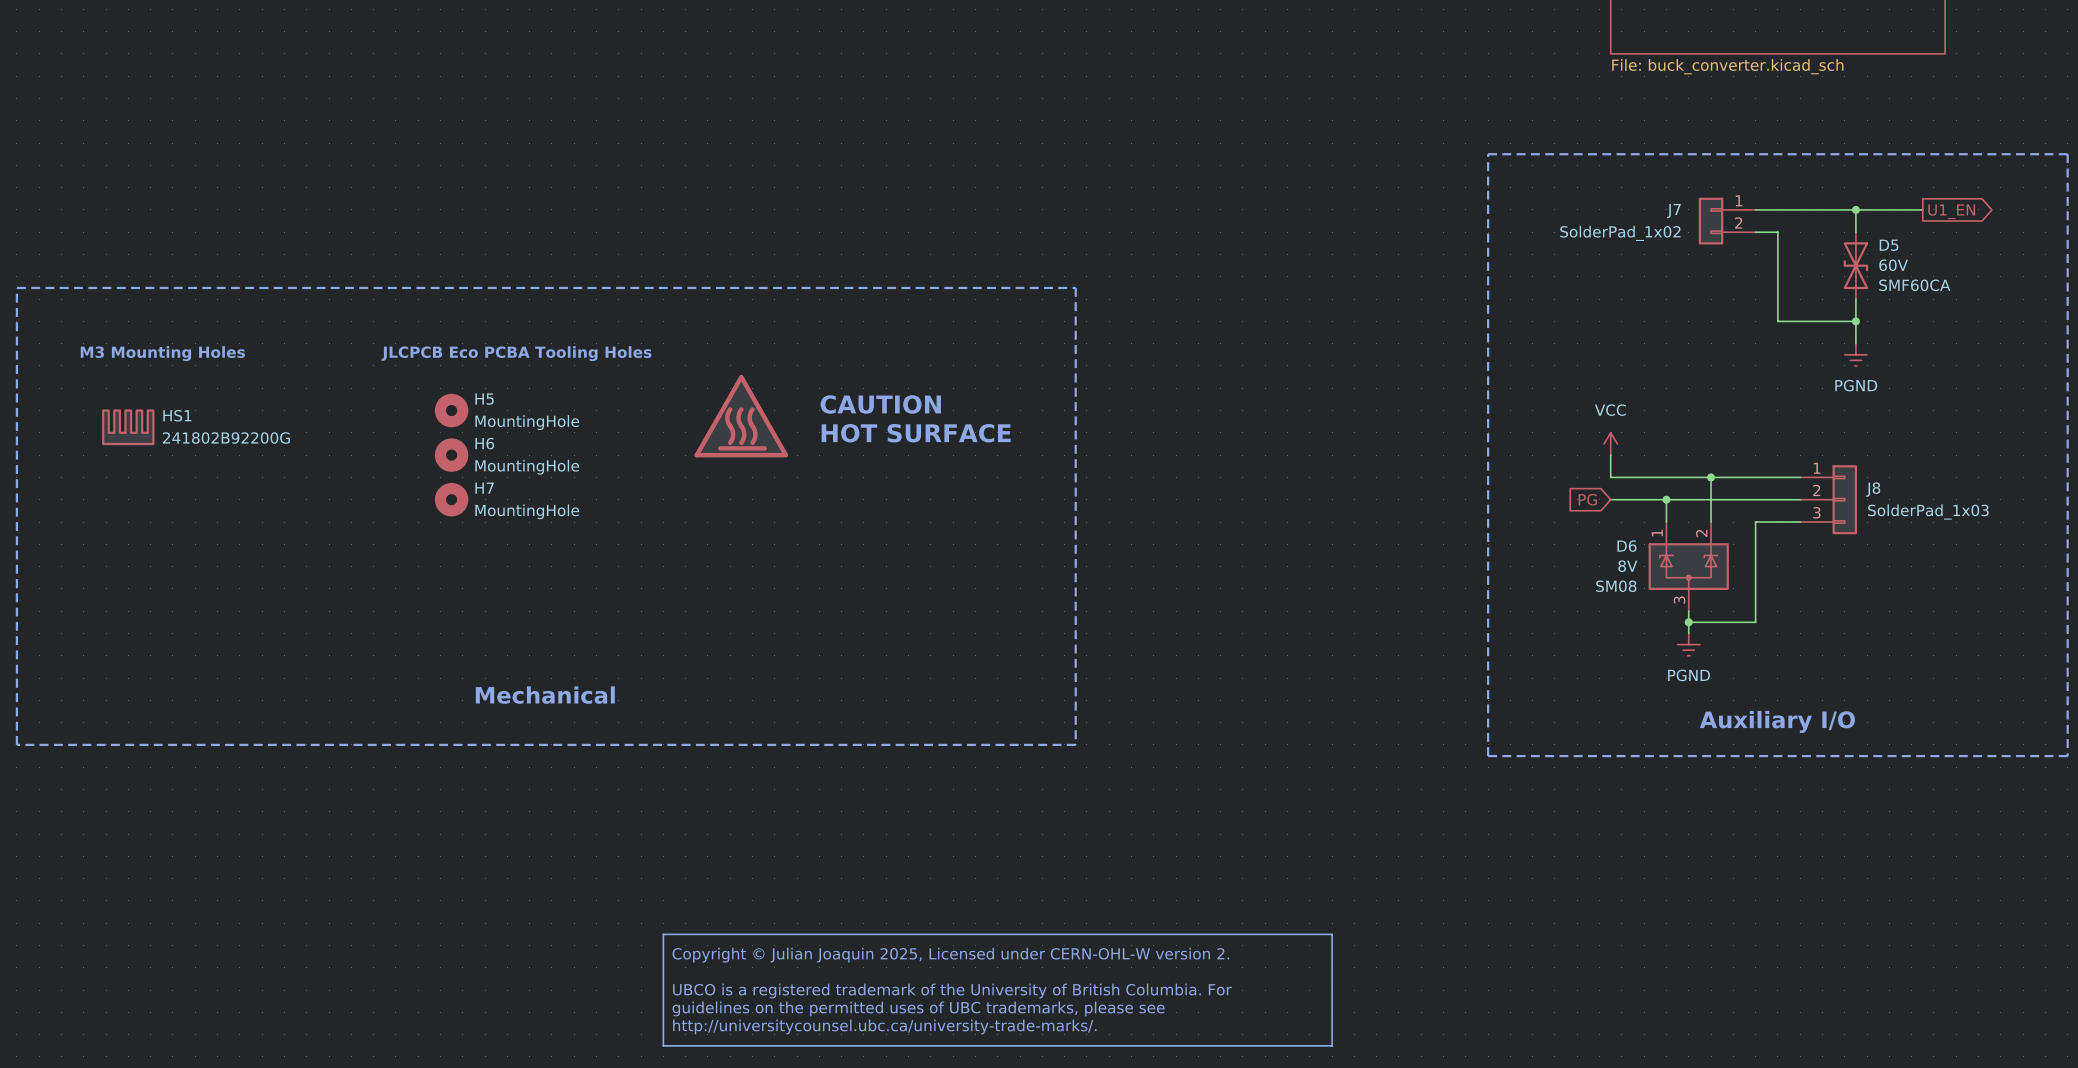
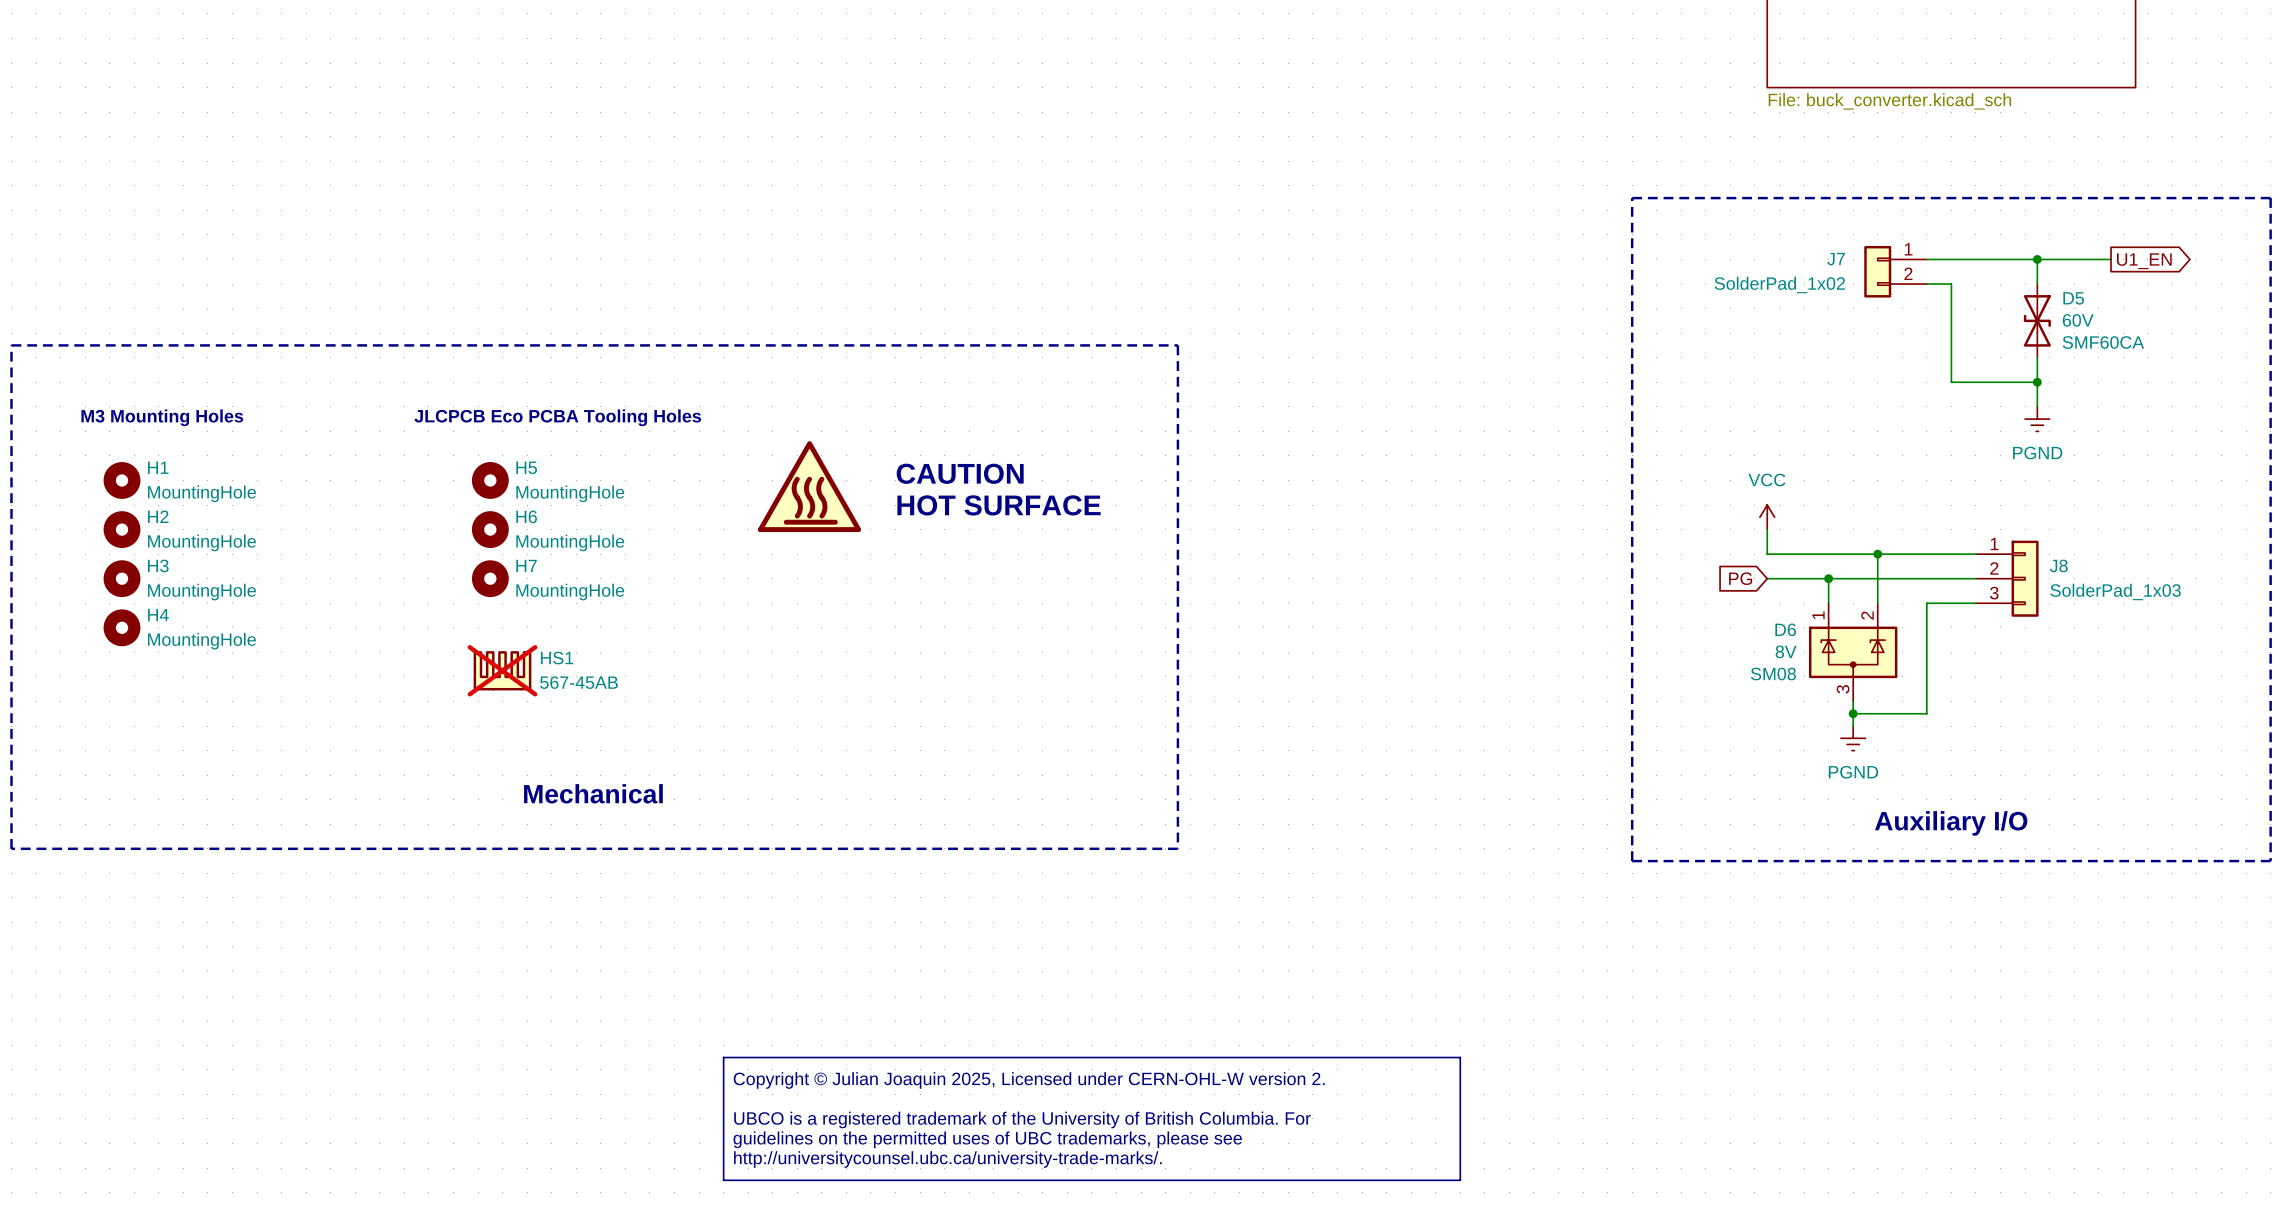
H1: none -> MountingHole (122, 480)
HS1 position: (128, 427) -> (502, 670)
HS1 value: 241802B92200G (226, 438) -> 567-45AB (579, 682)
H2: none -> MountingHole (122, 529)
H3: none -> MountingHole (122, 578)
H4: none -> MountingHole (122, 627)
HS1 do-not-place cross: none -> (502, 670)

